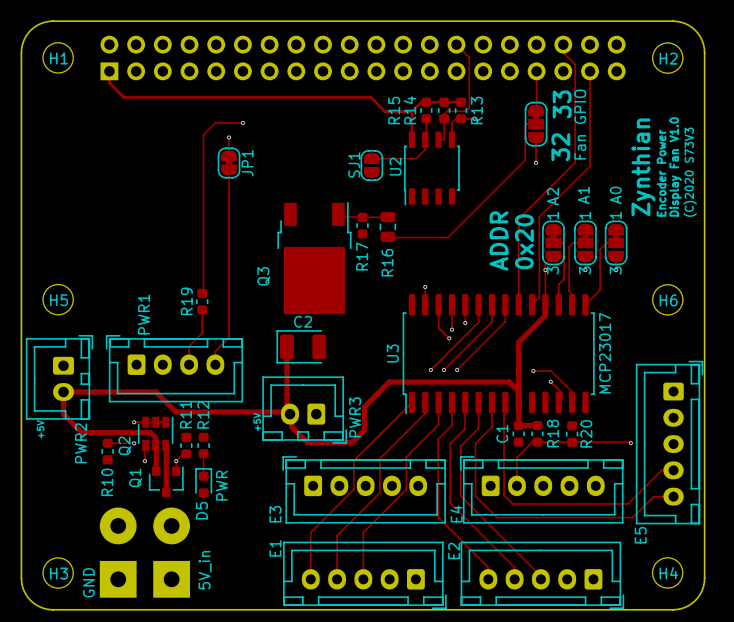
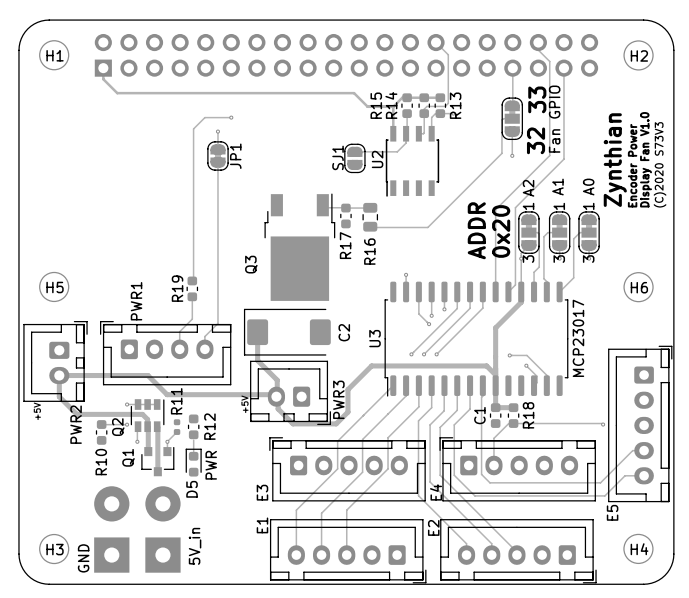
C2 name position: C2 (303, 321) -> C2 (344, 332)
C2 footprint: [276, 330, 327, 364] -> [243, 308, 331, 356]
track: none -> (257, 332) (257, 360) (277, 380) (277, 393)
track: (286, 346) (286, 411) (290, 414) -> none
R12 name position: R12 (203, 414) -> R12 (209, 426)
R11 footprint: [180, 432, 193, 459] -> [173, 419, 181, 435]
R20: (572, 434) -> none

